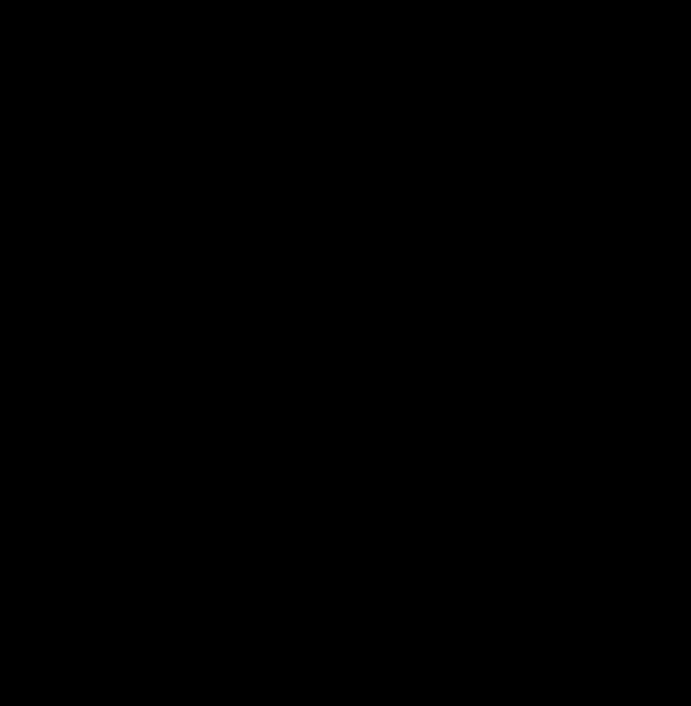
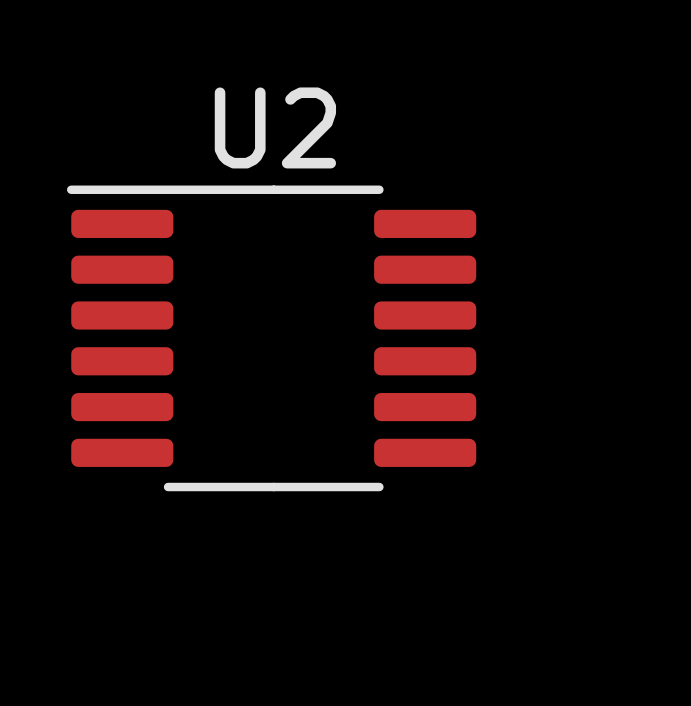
U2: none -> (271, 338)

